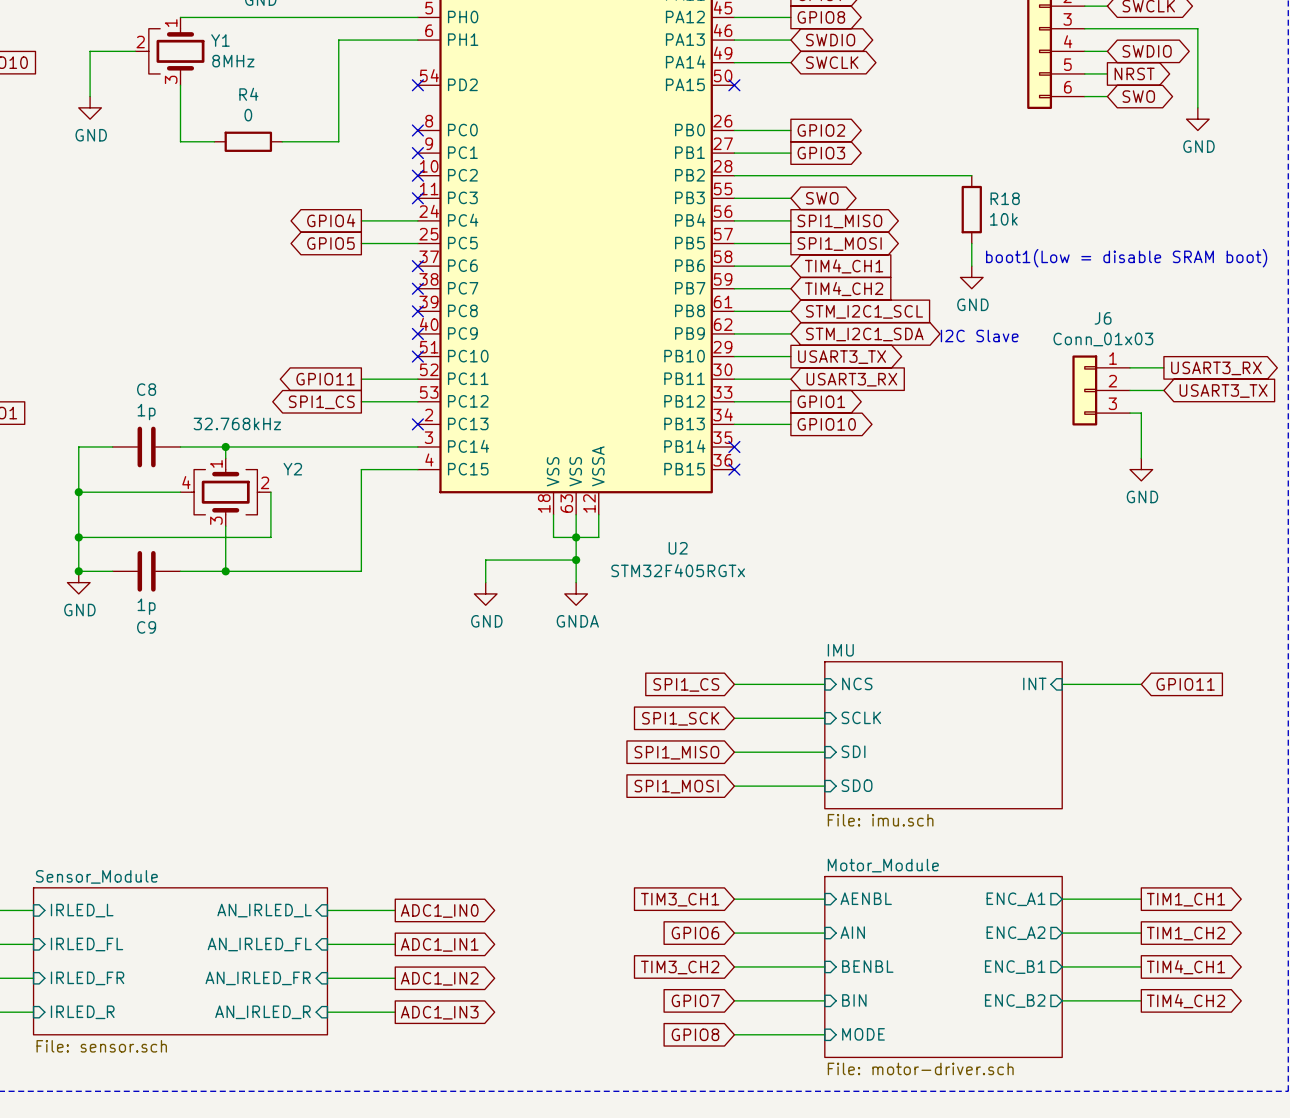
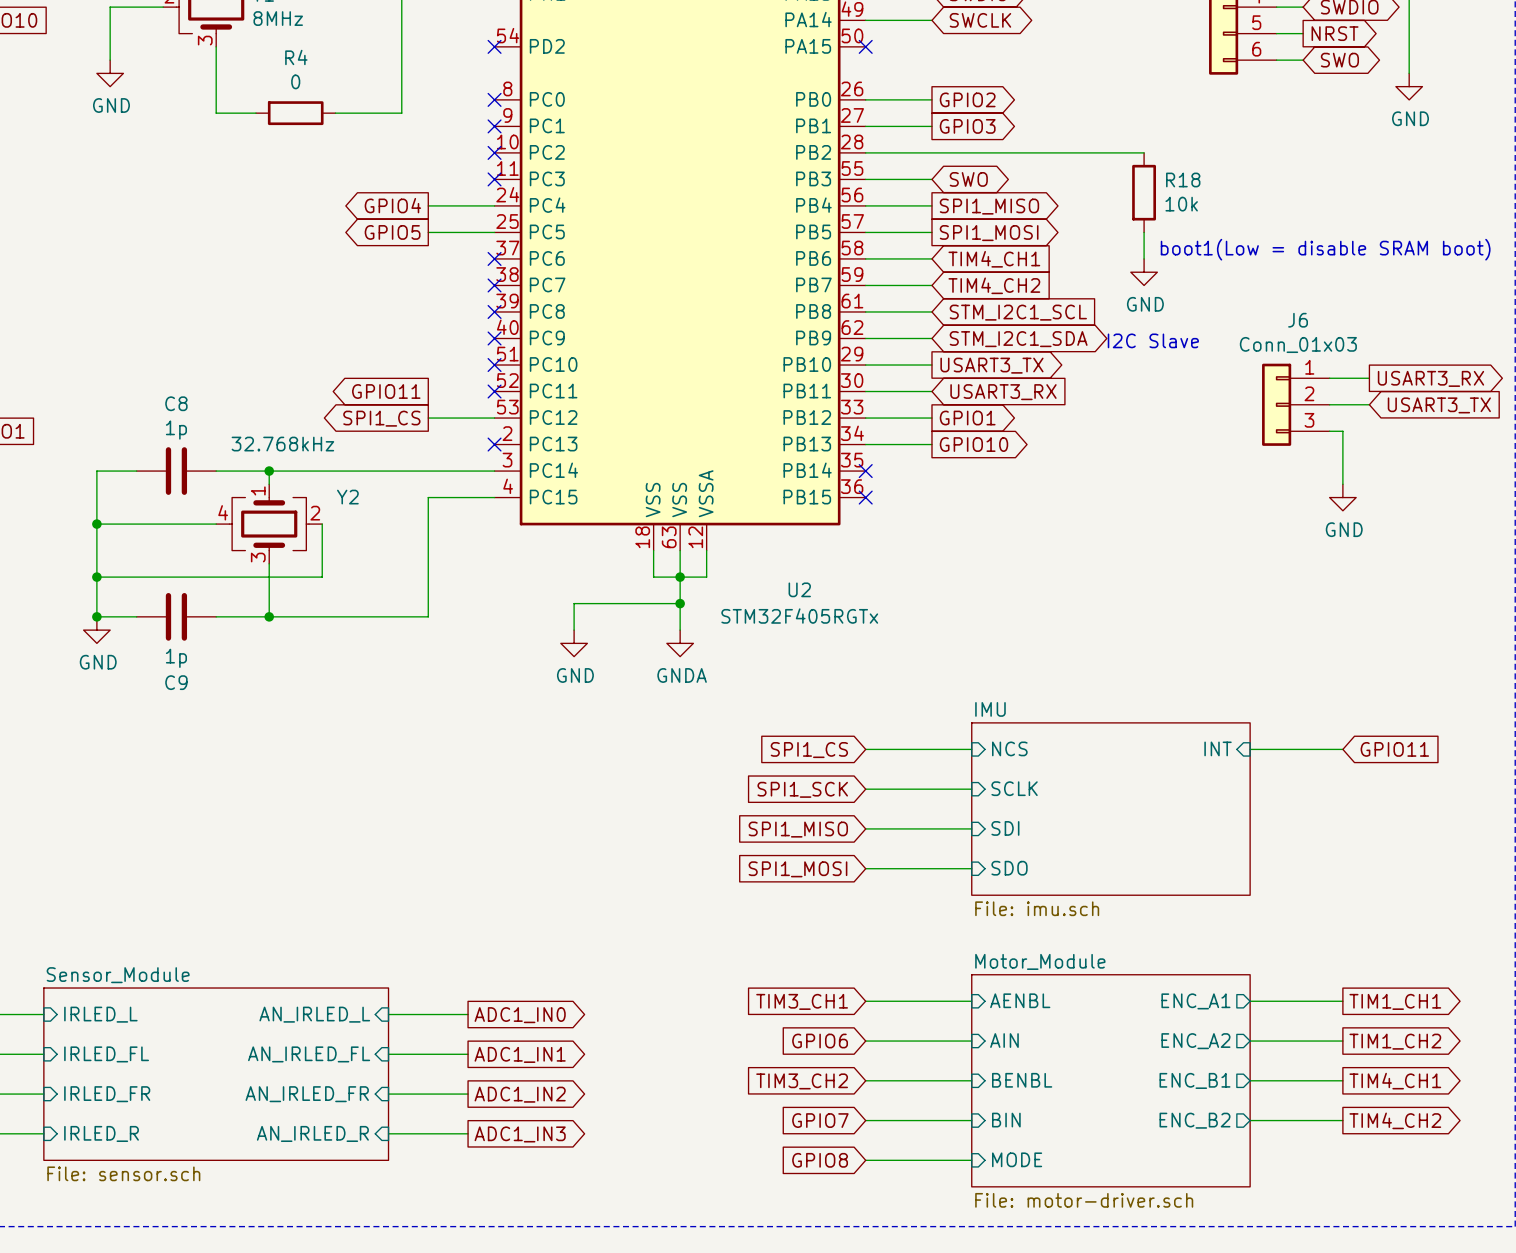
wire: (361, 379) (417, 379) -> none
no-connect mark: none -> (494, 391)

